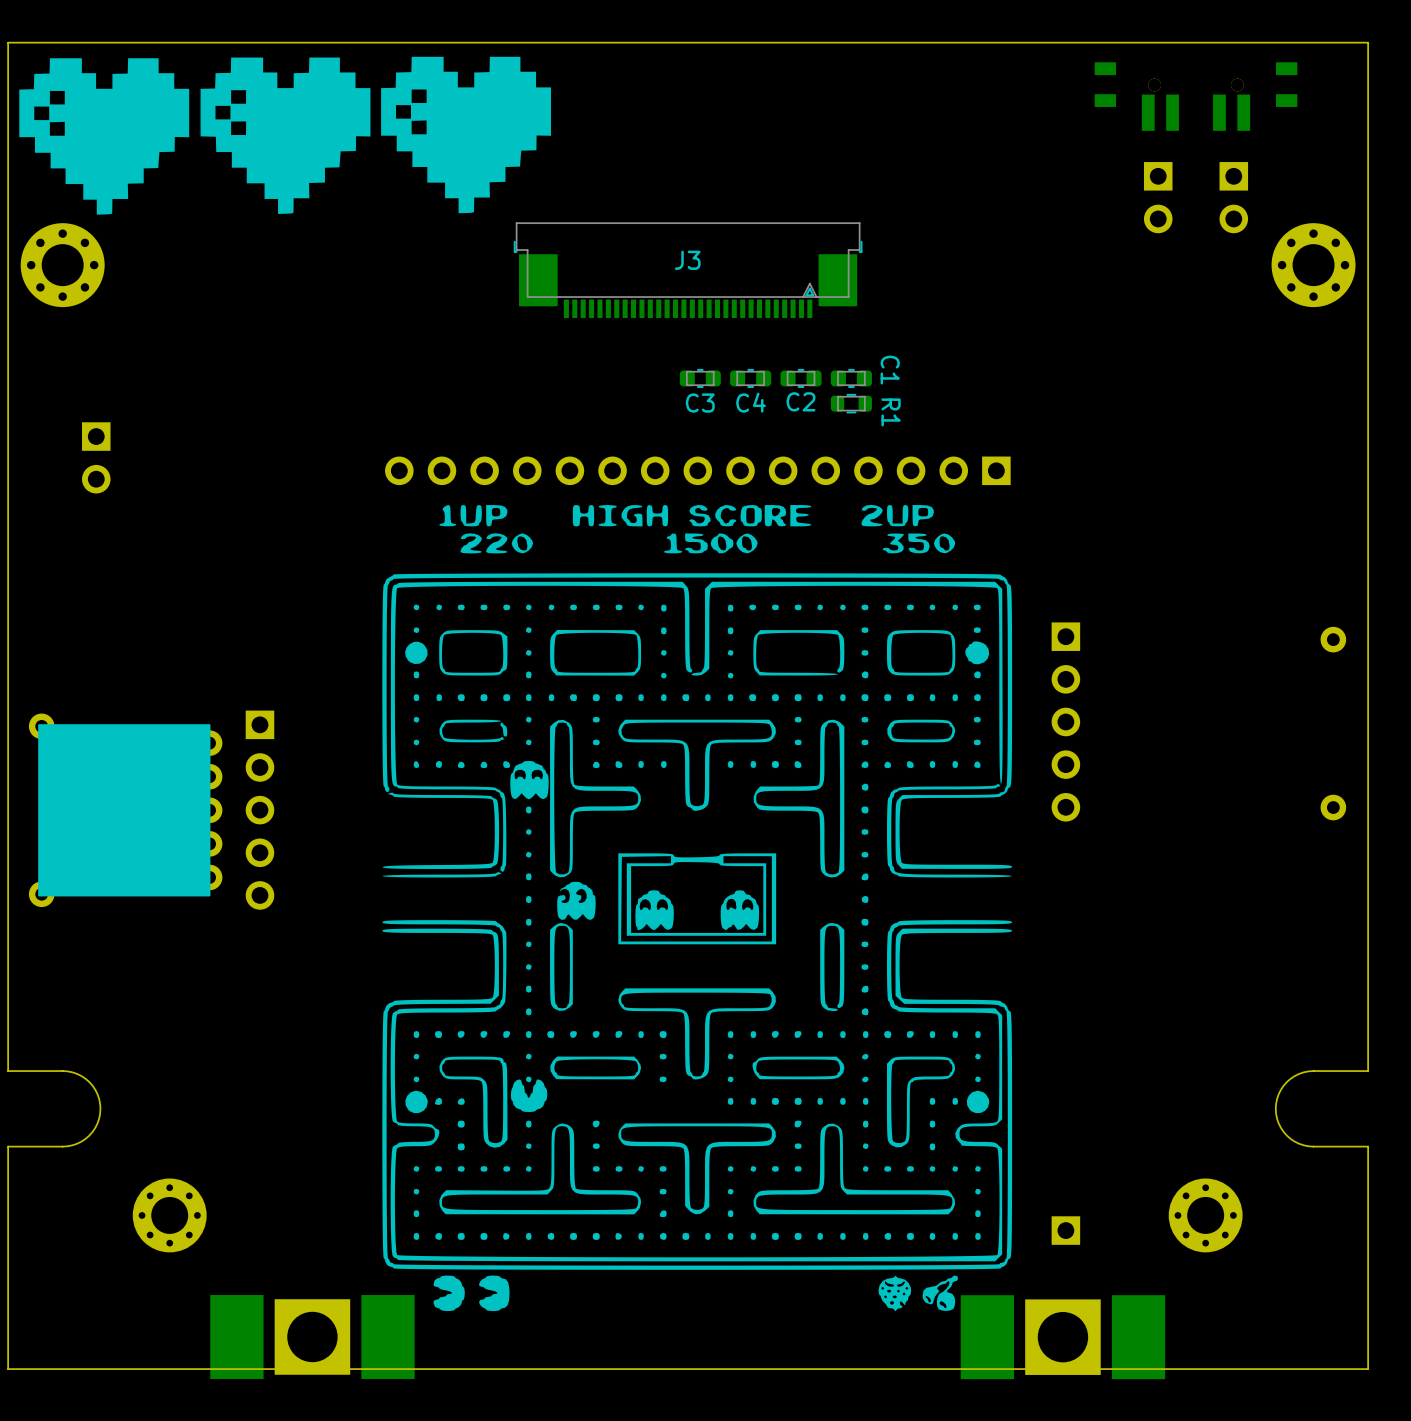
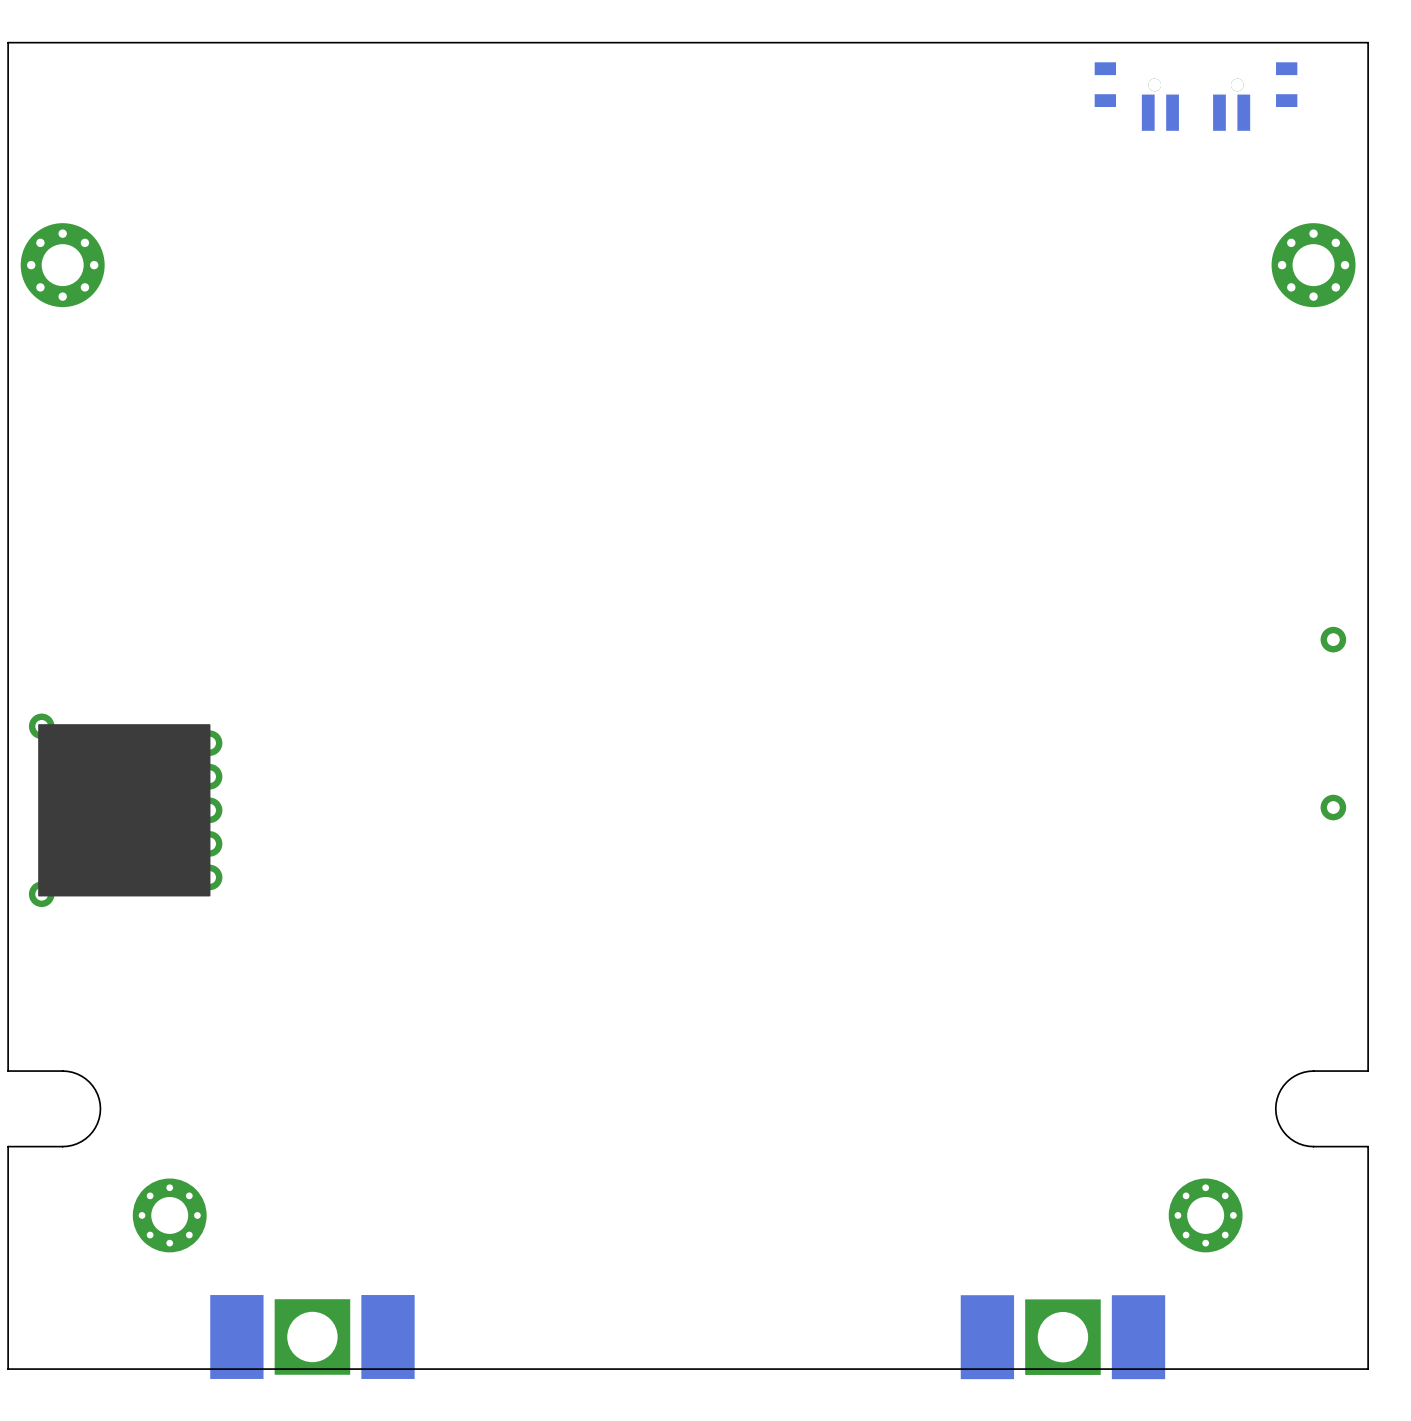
part: (285, 135) -> none
part: (1158, 197) -> none
part: (1233, 197) -> none
J3: (688, 270) -> none
C3: (700, 378) -> none
C4: (750, 378) -> none
C2: (801, 378) -> none
C1: (851, 378) -> none
R1: (851, 403) -> none
part: (96, 457) -> none
part: (697, 470) -> none
drawing: [382, 504, 1013, 1312] -> none
part: (1065, 721) -> none
part: (259, 810) -> none
part: (1065, 1230) -> none

